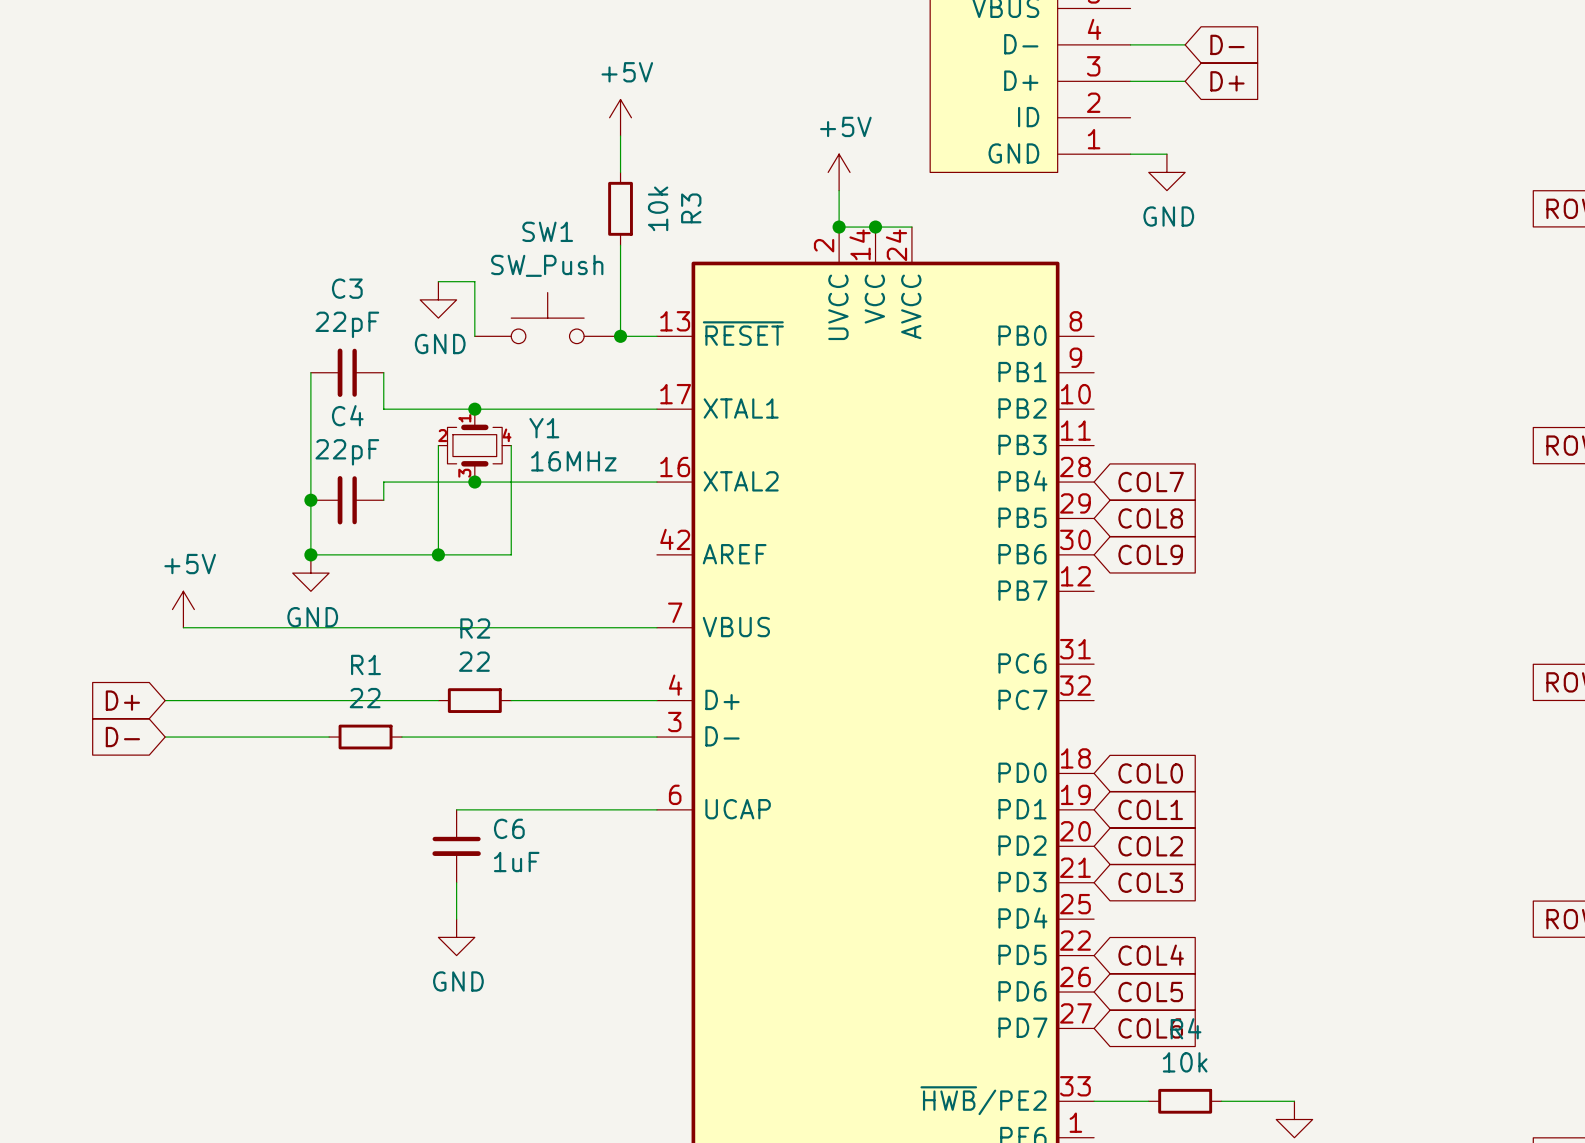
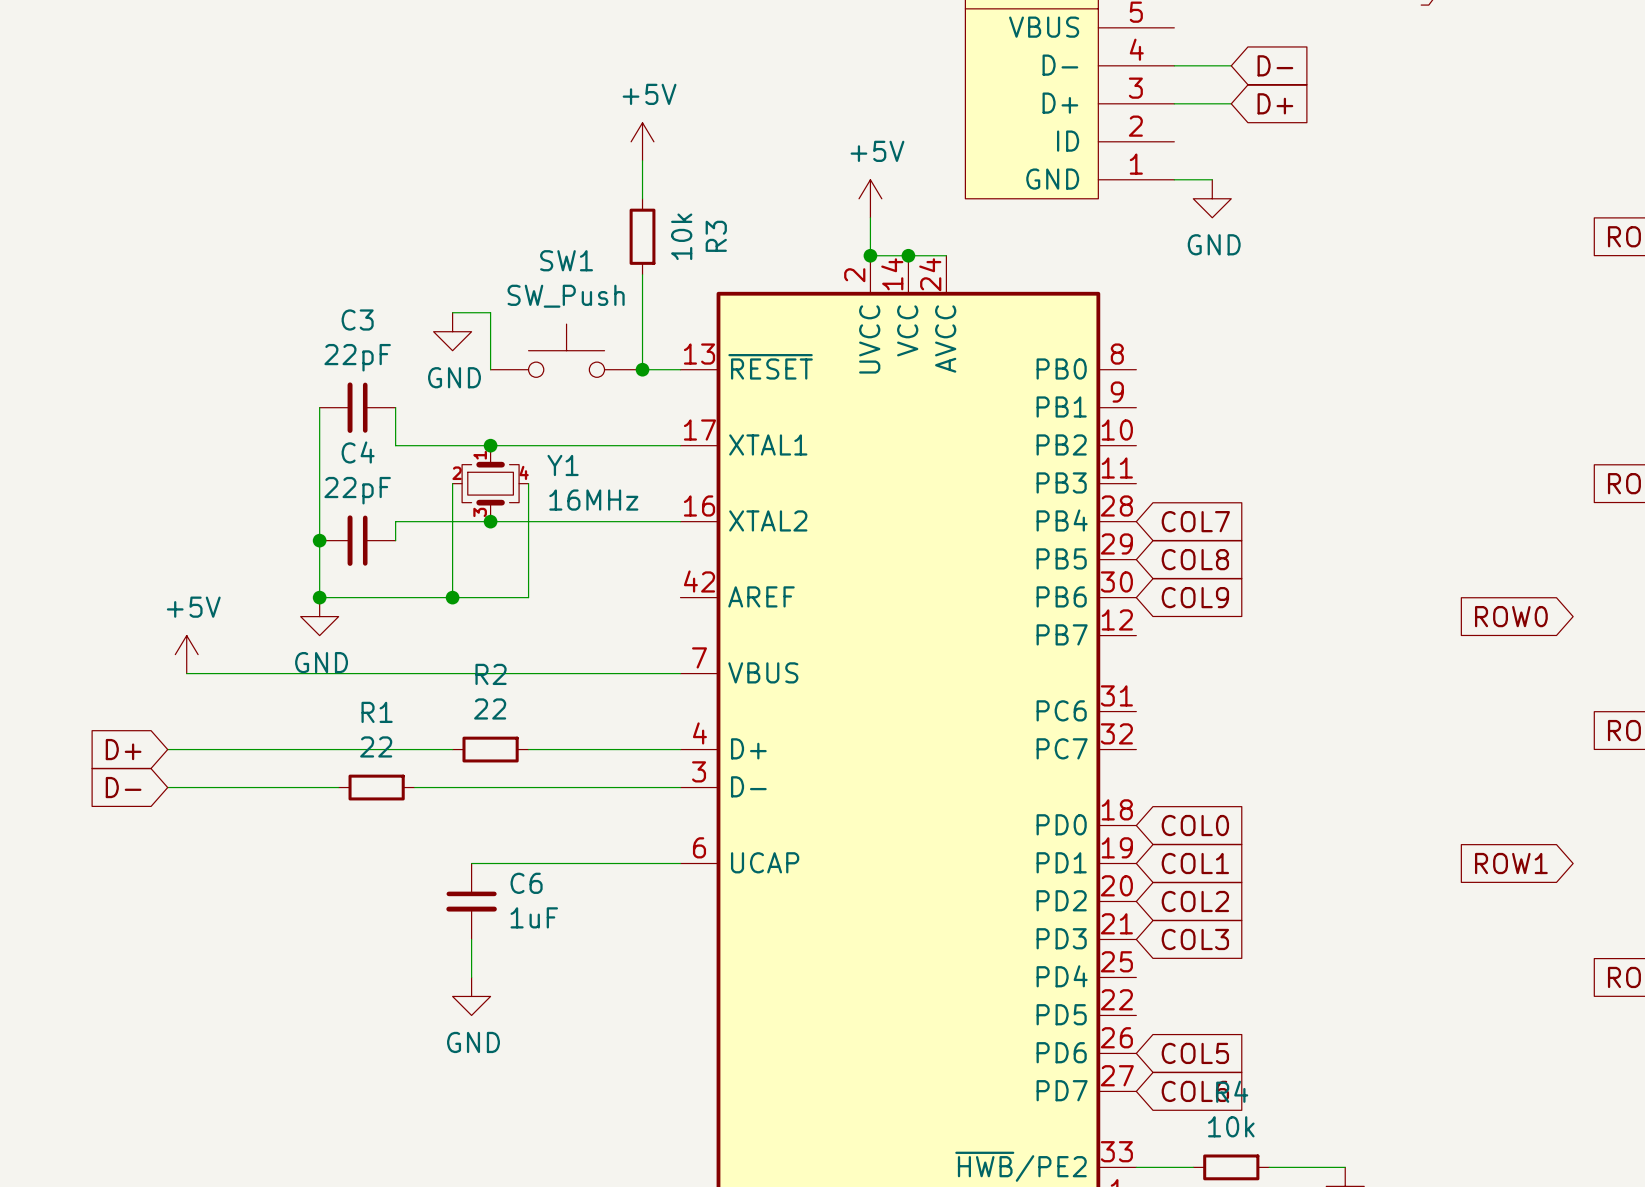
global label: none -> ROW0 (1511, 616)
global label: none -> ROW1 (1511, 863)
global label: COL4 (1151, 955) -> none

